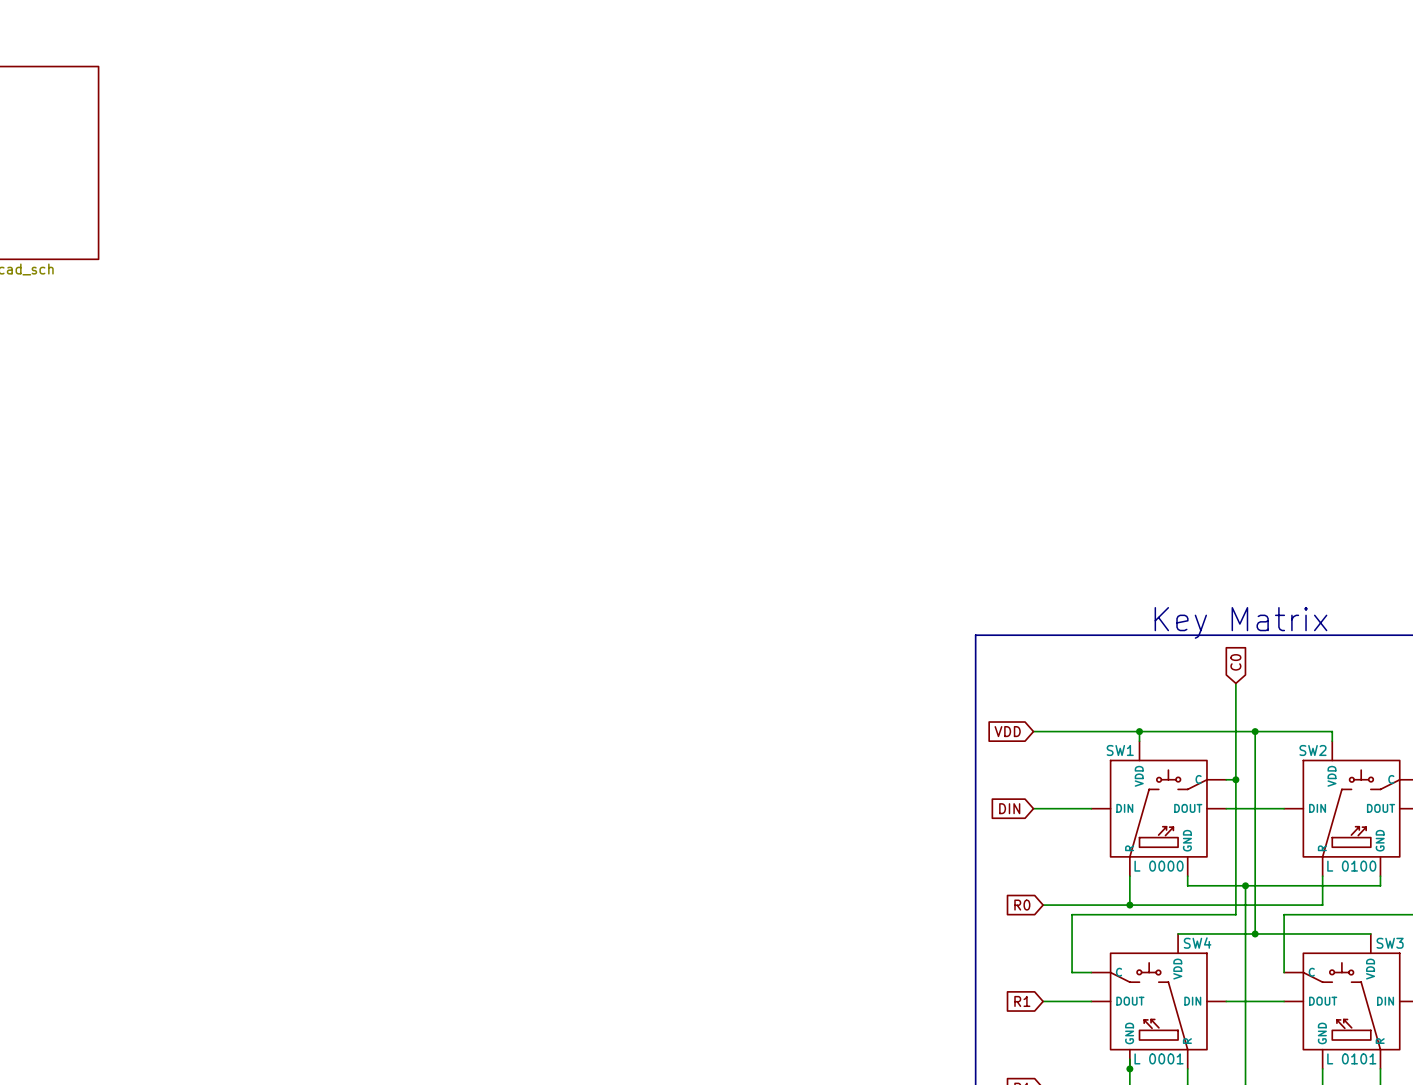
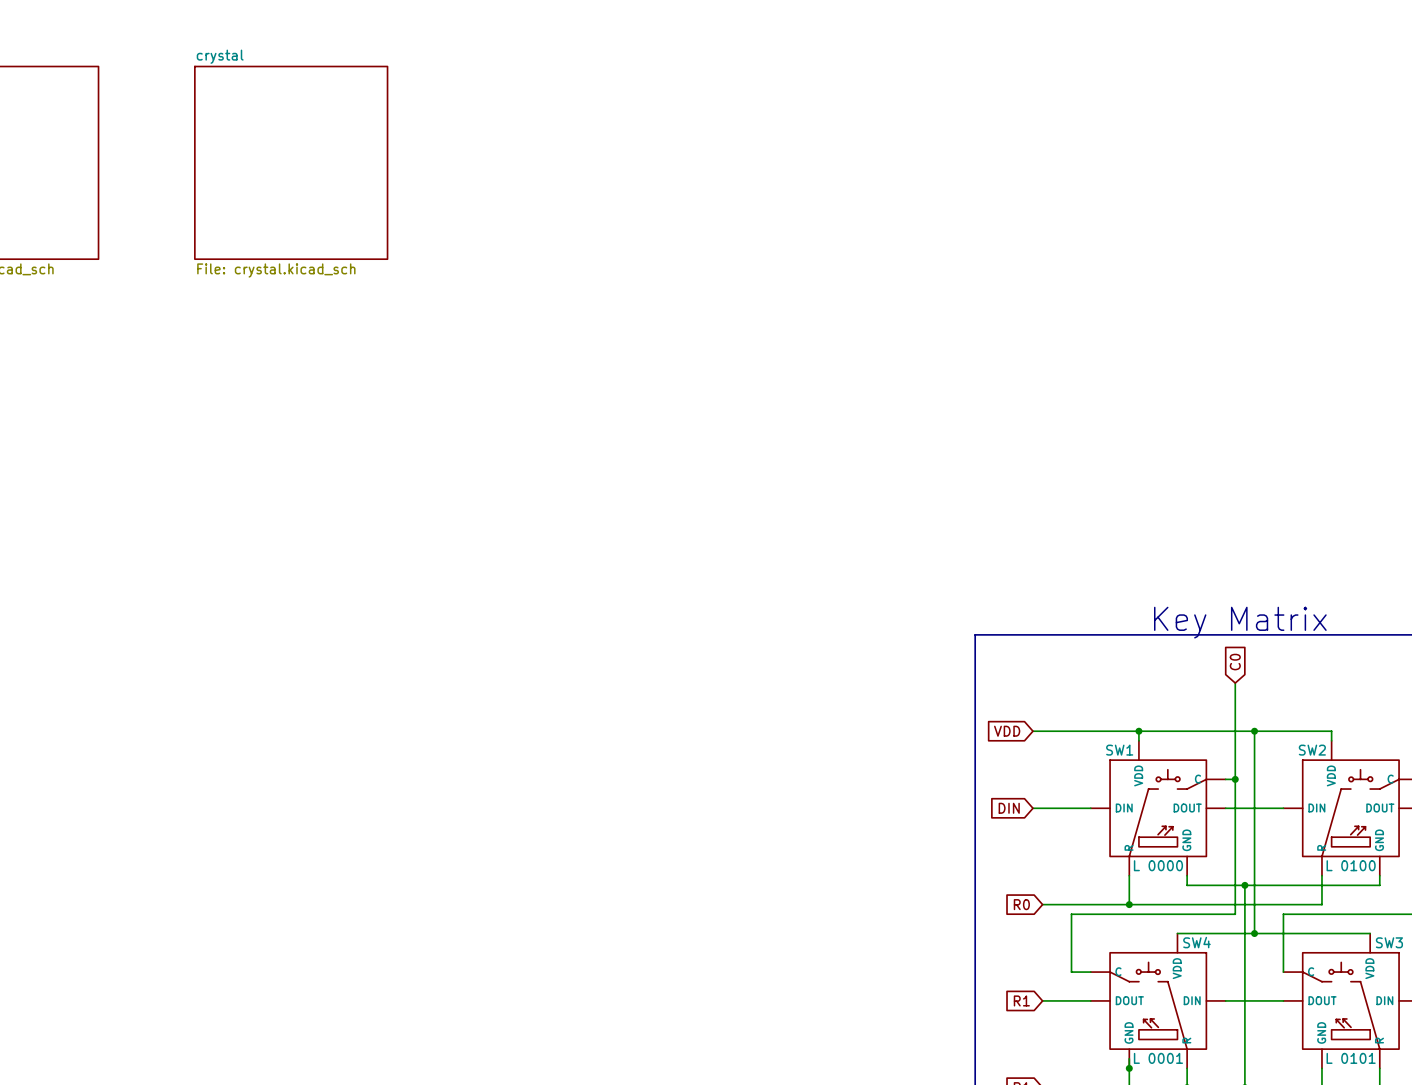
sheet crystal: none -> File: crystal.kicad_sch (291, 162)

